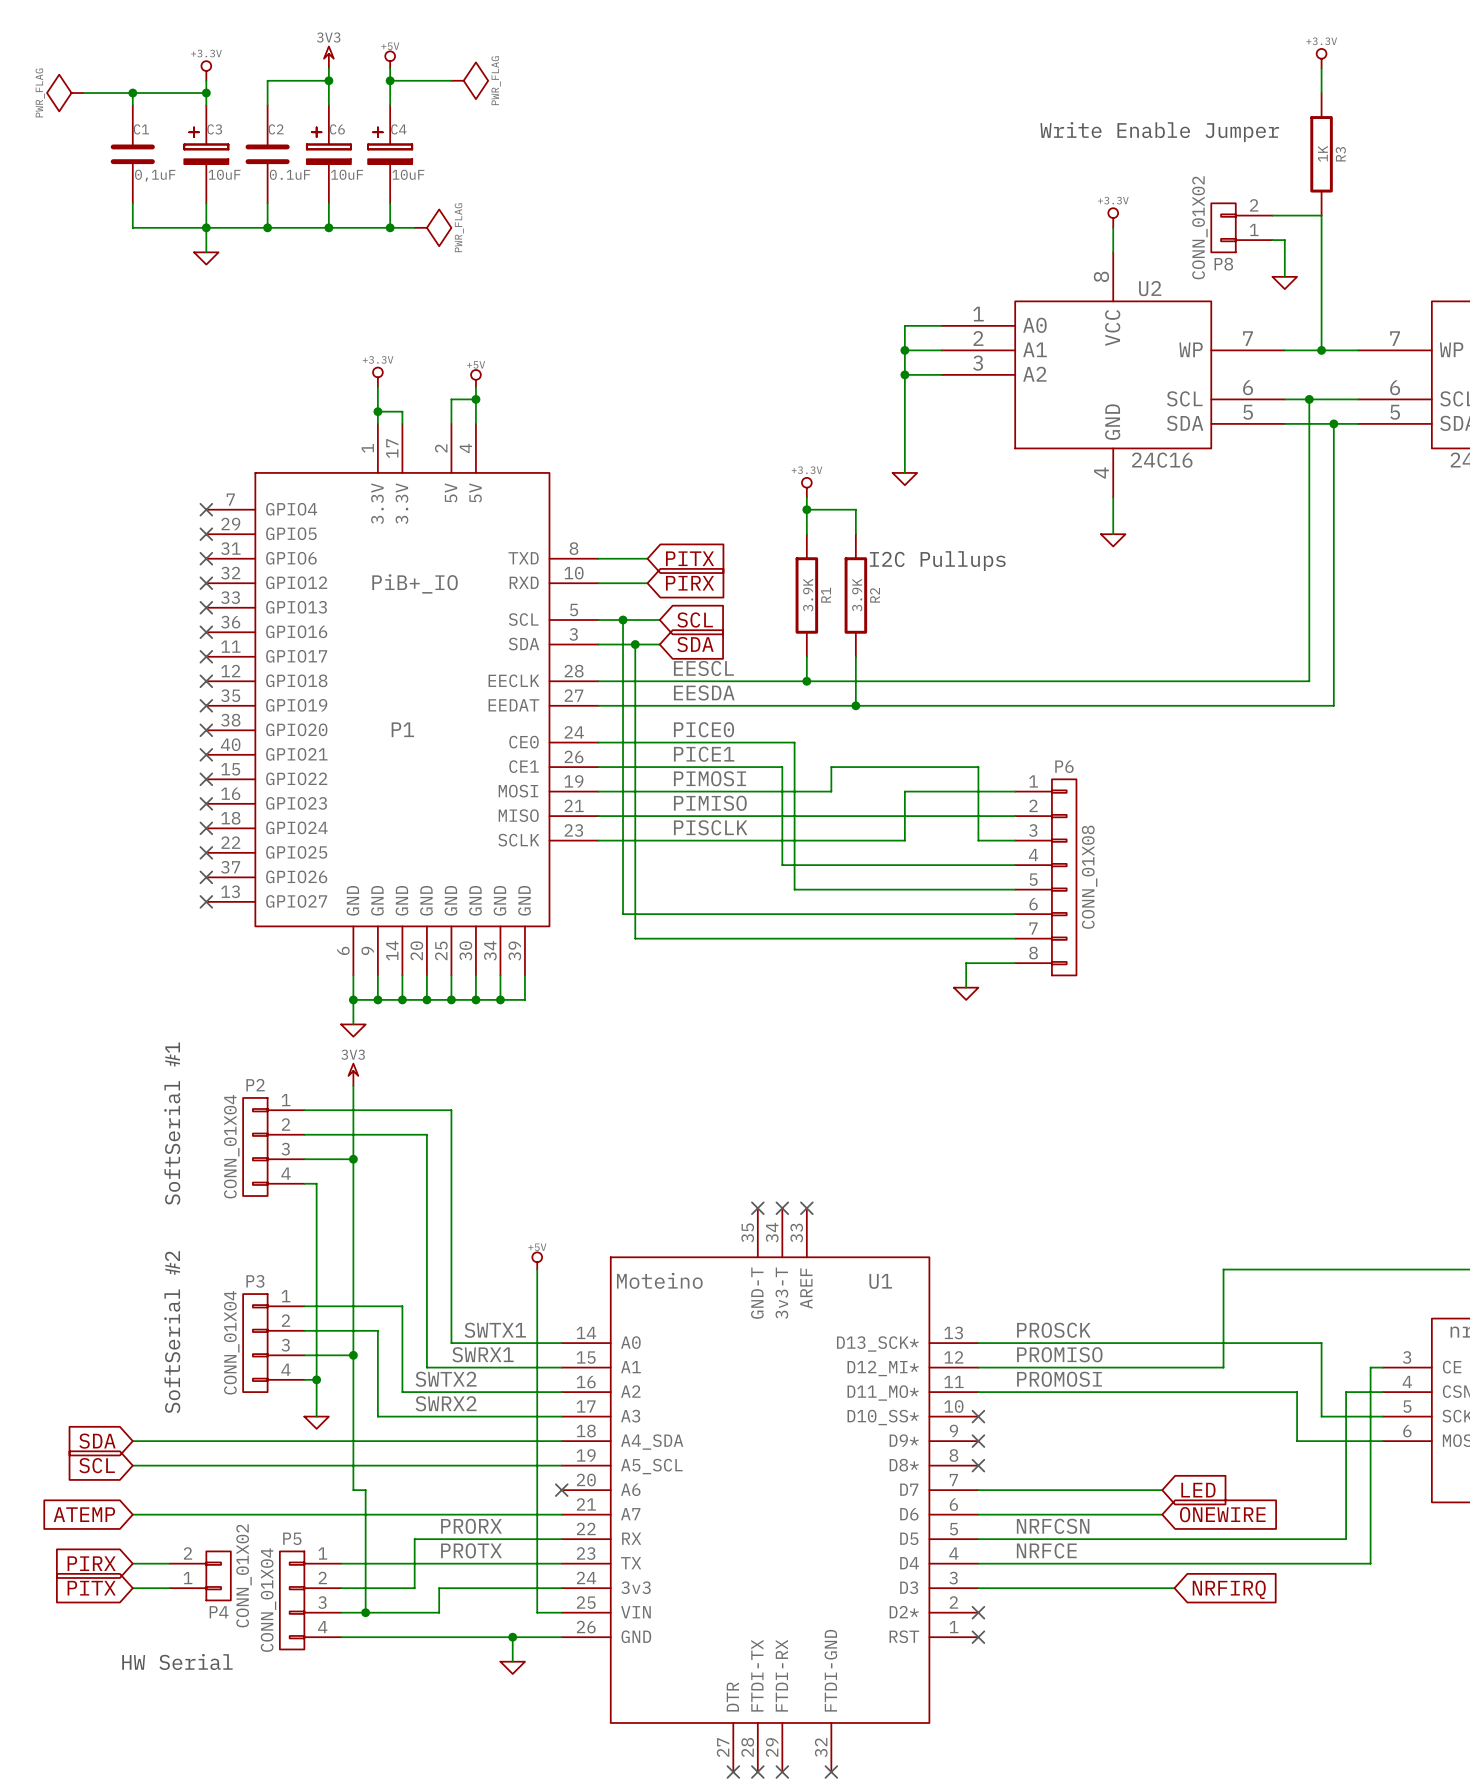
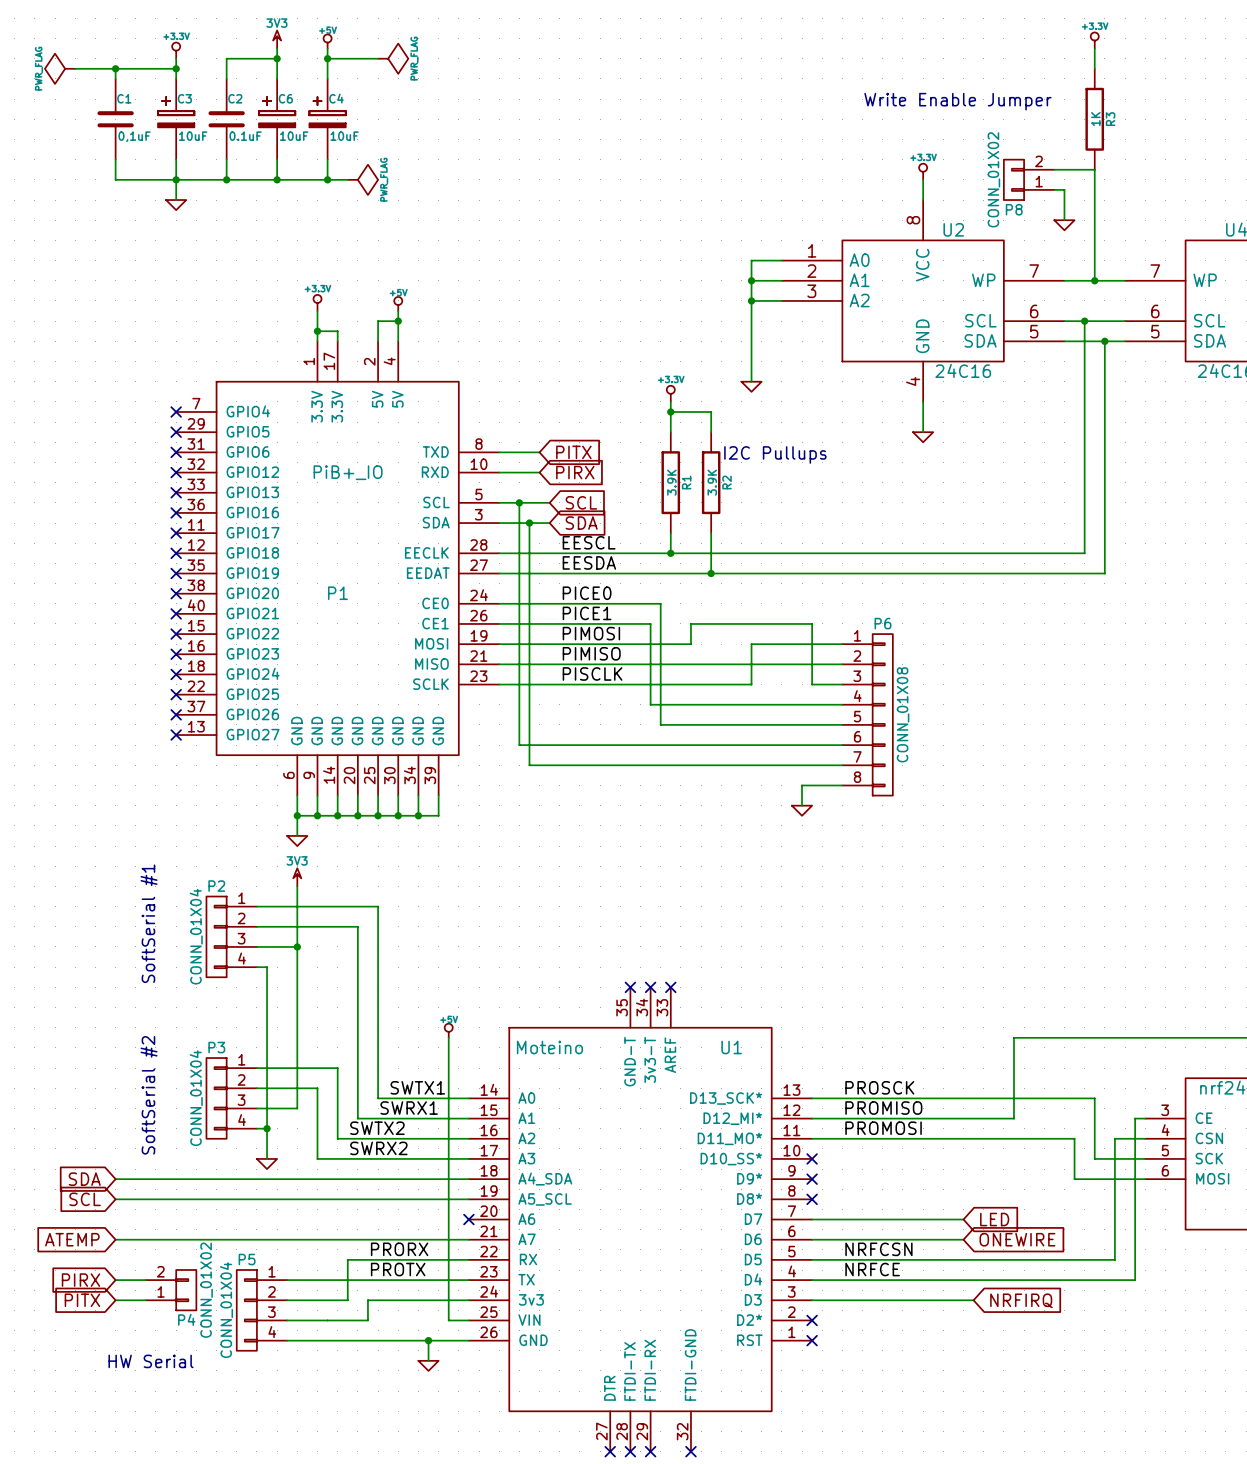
wire: (353, 1355) (353, 1490) (365, 1490) (365, 1612) -> none
junction: (353, 1355) -> none
junction: (365, 1612) -> none

